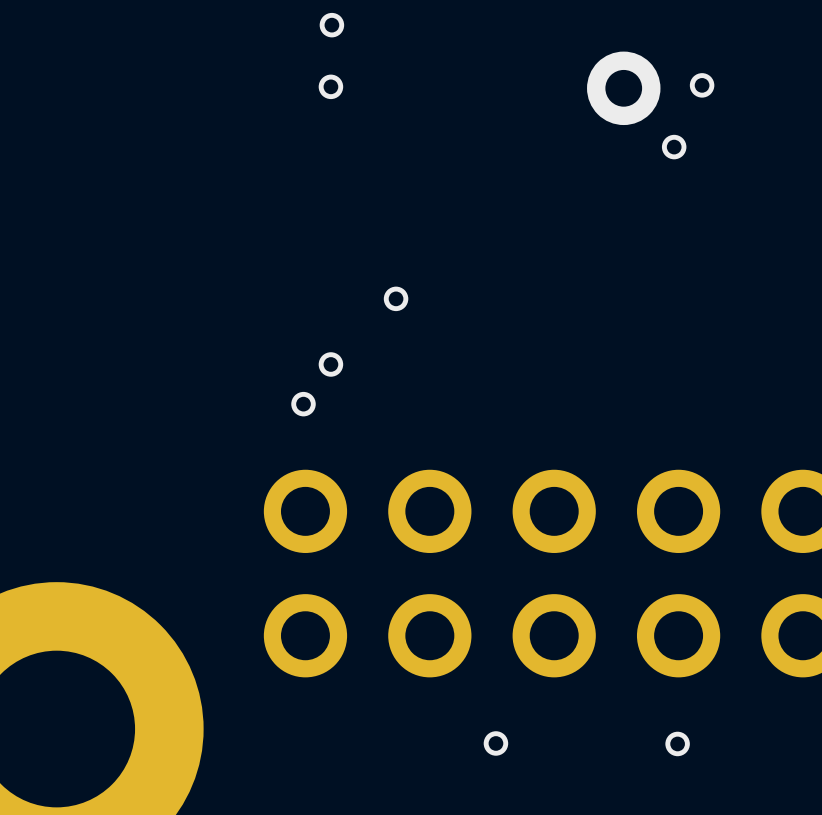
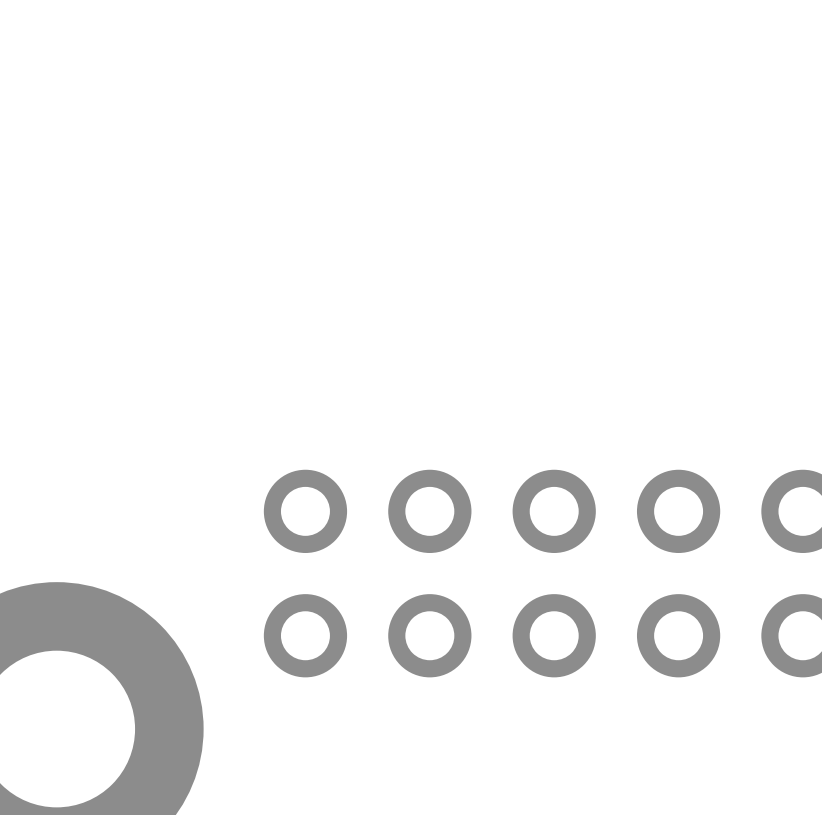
via: (331, 25) -> none
via: (702, 85) -> none
via: (330, 86) -> none
via: (623, 88) -> none
via: (674, 147) -> none
via: (396, 298) -> none
via: (330, 364) -> none
via: (303, 404) -> none
via: (495, 743) -> none
via: (677, 743) -> none

